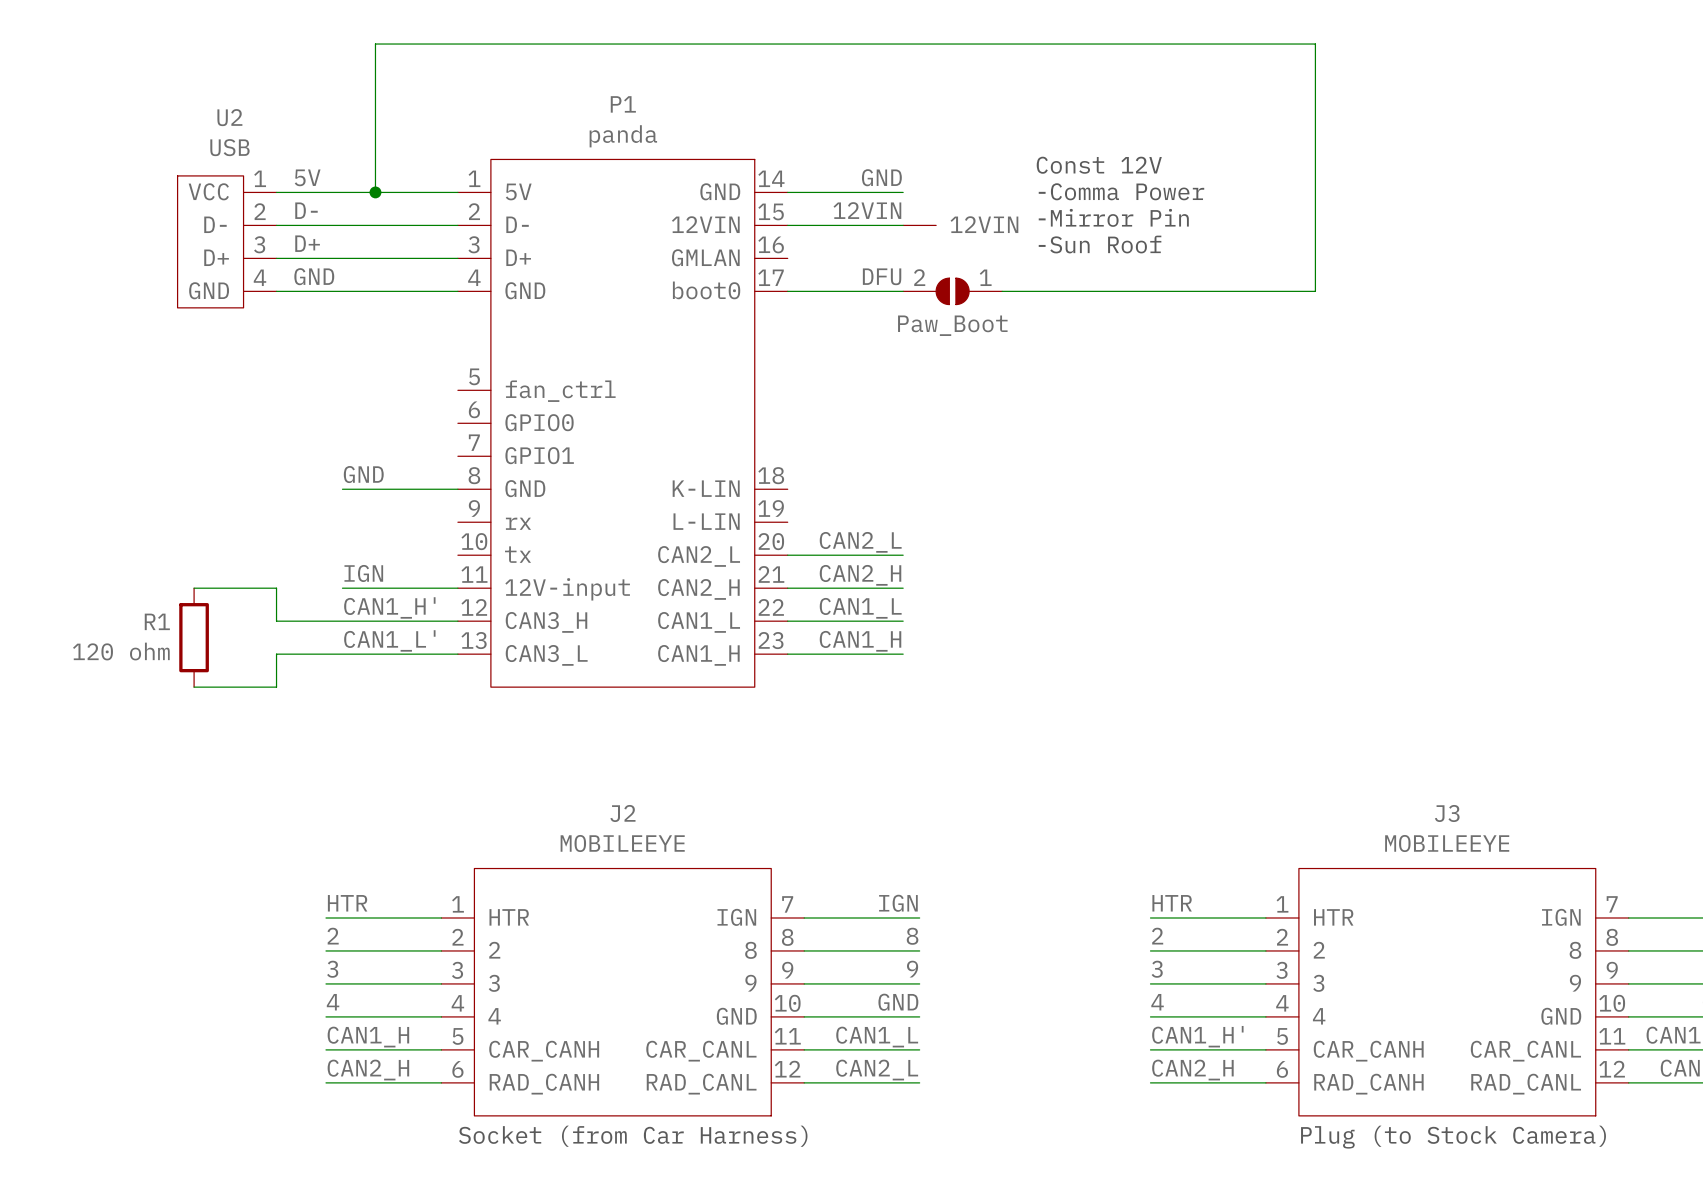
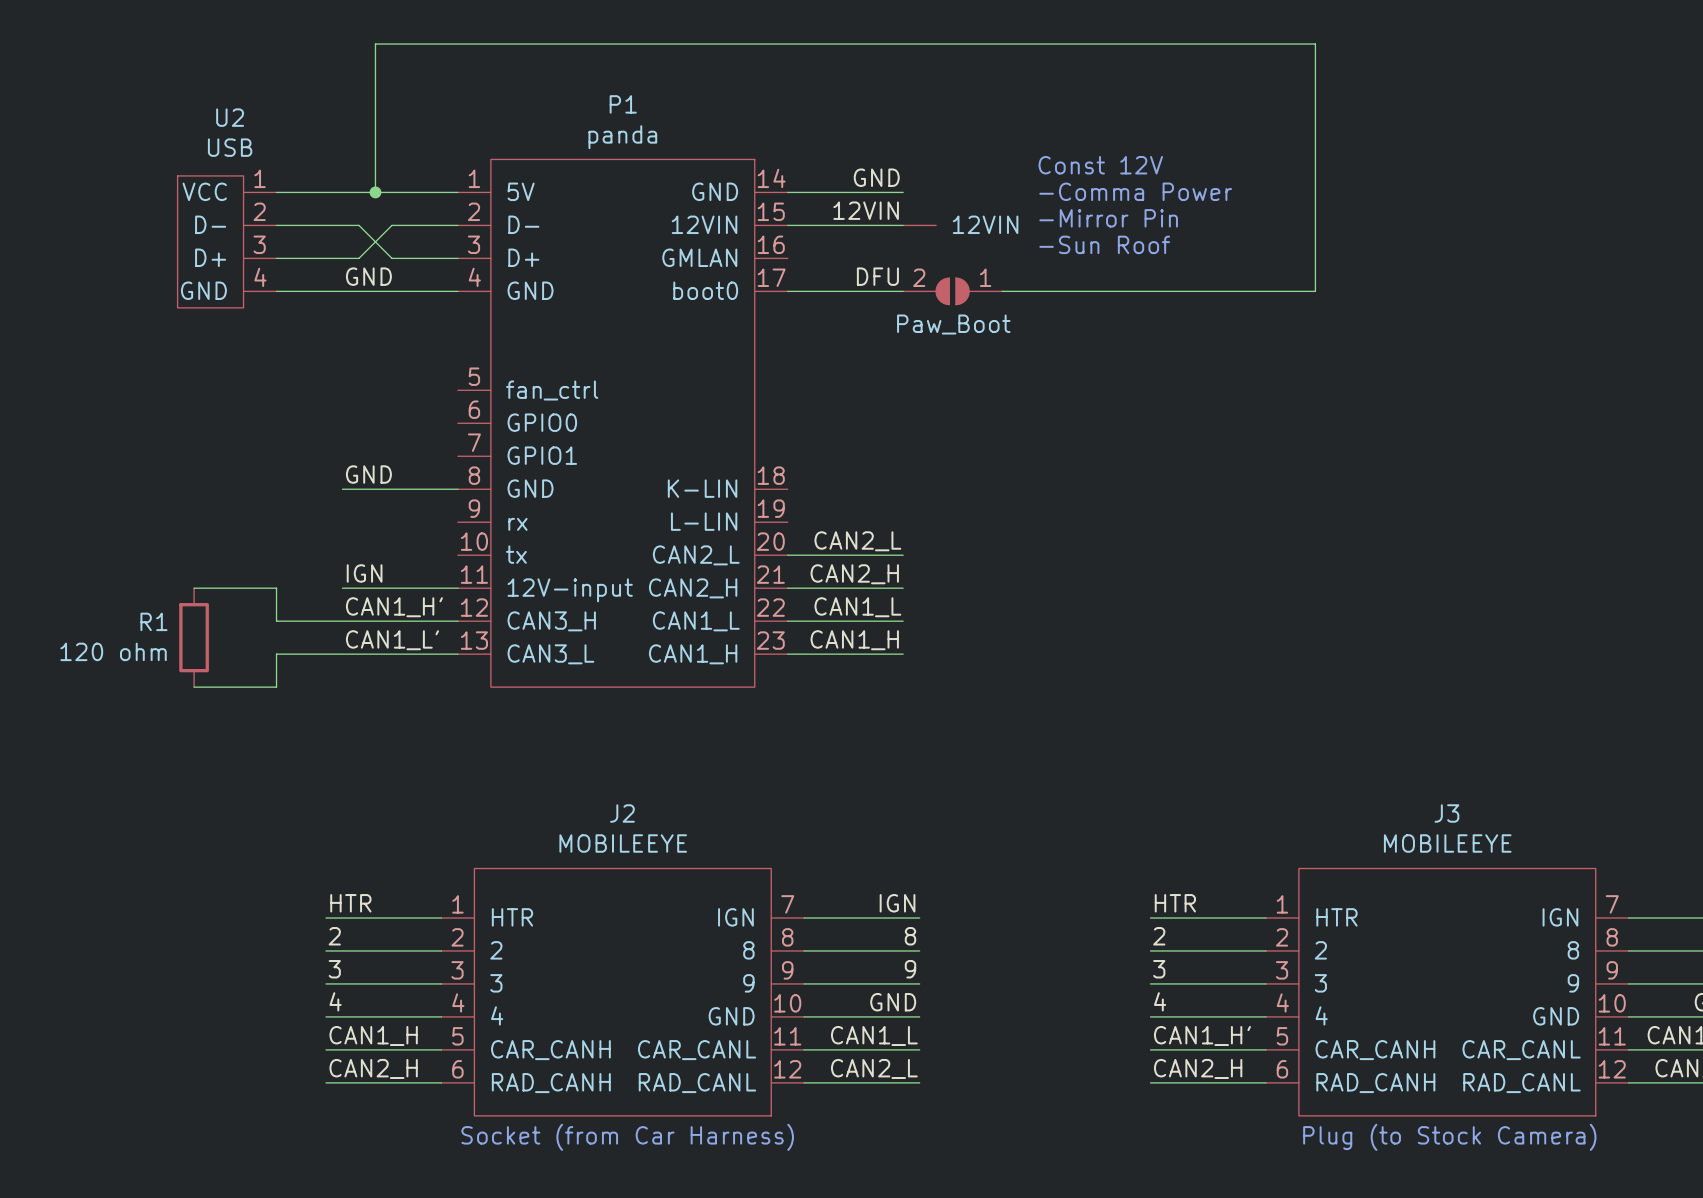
label: 5V (307, 177) -> none
label: D- (306, 210) -> none
wire: (358, 225) (391, 225) -> (358, 225) (391, 258)
label: D+ (307, 243) -> none
wire: (358, 258) (391, 258) -> (358, 258) (391, 225)
label position: GND (314, 276) -> GND (368, 276)

